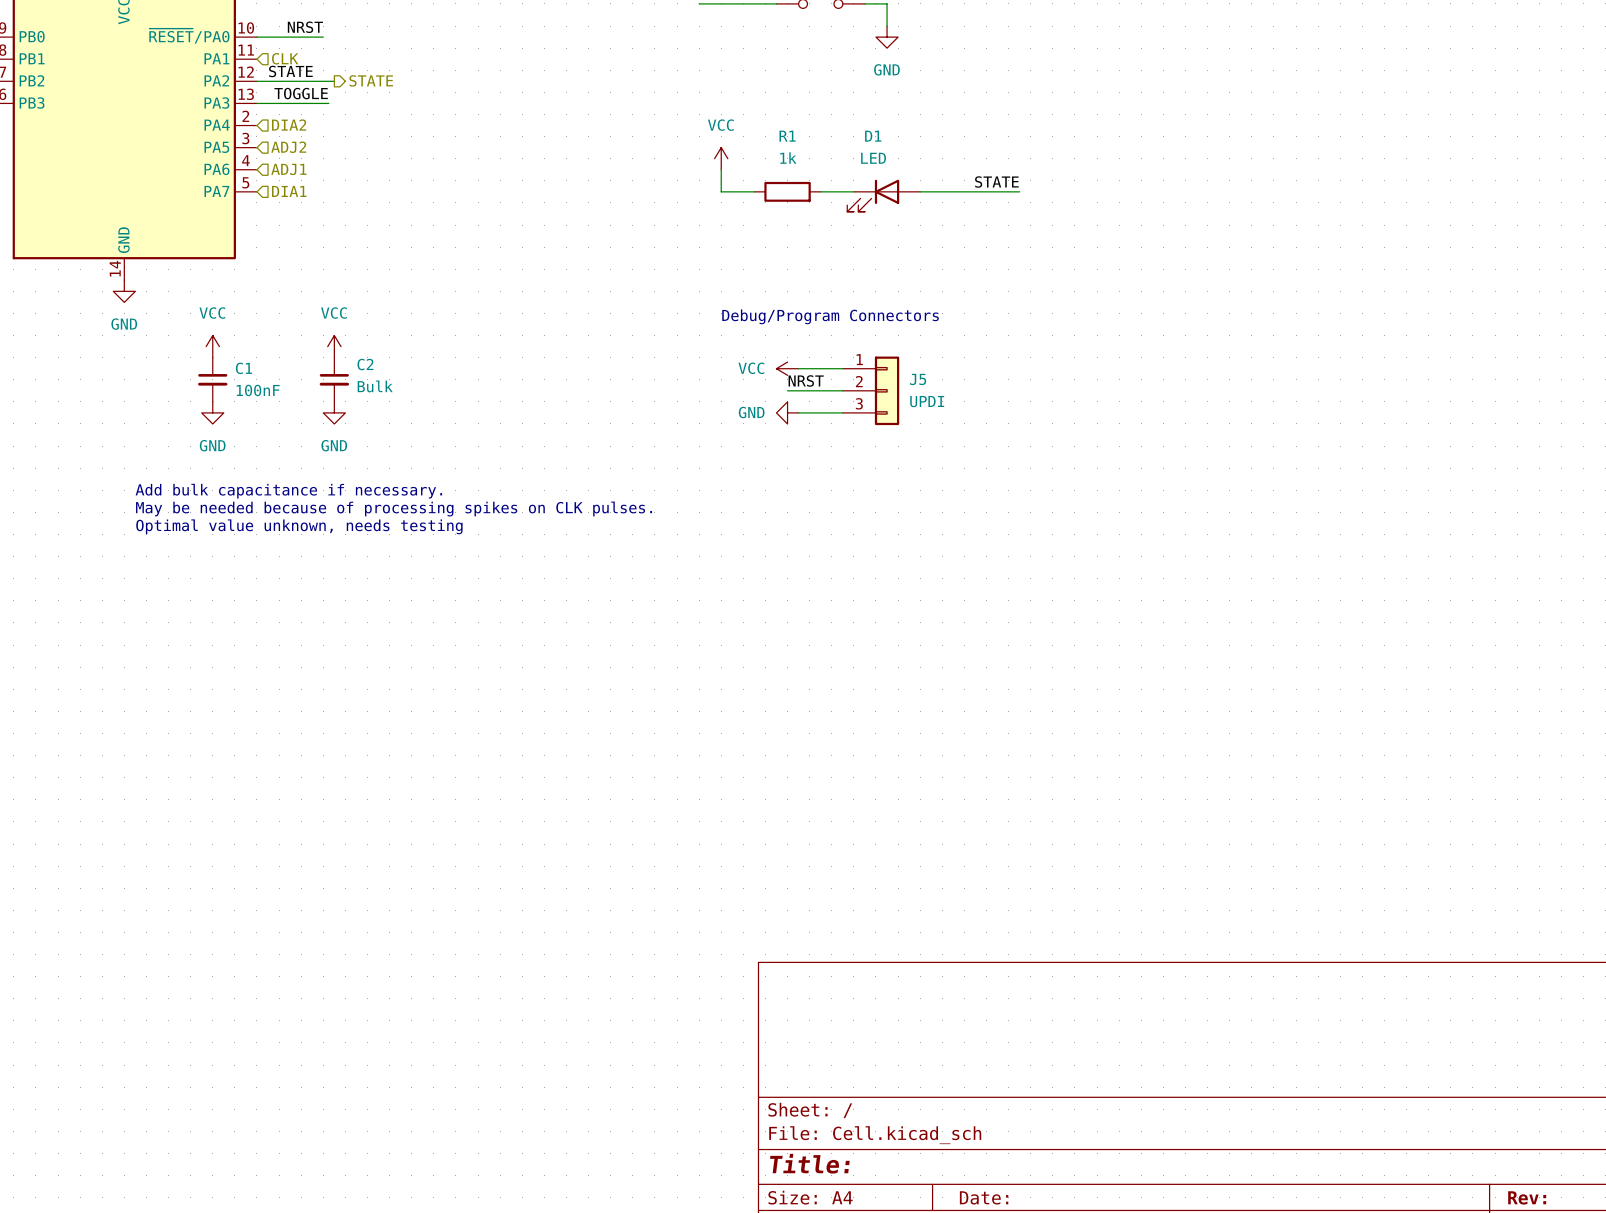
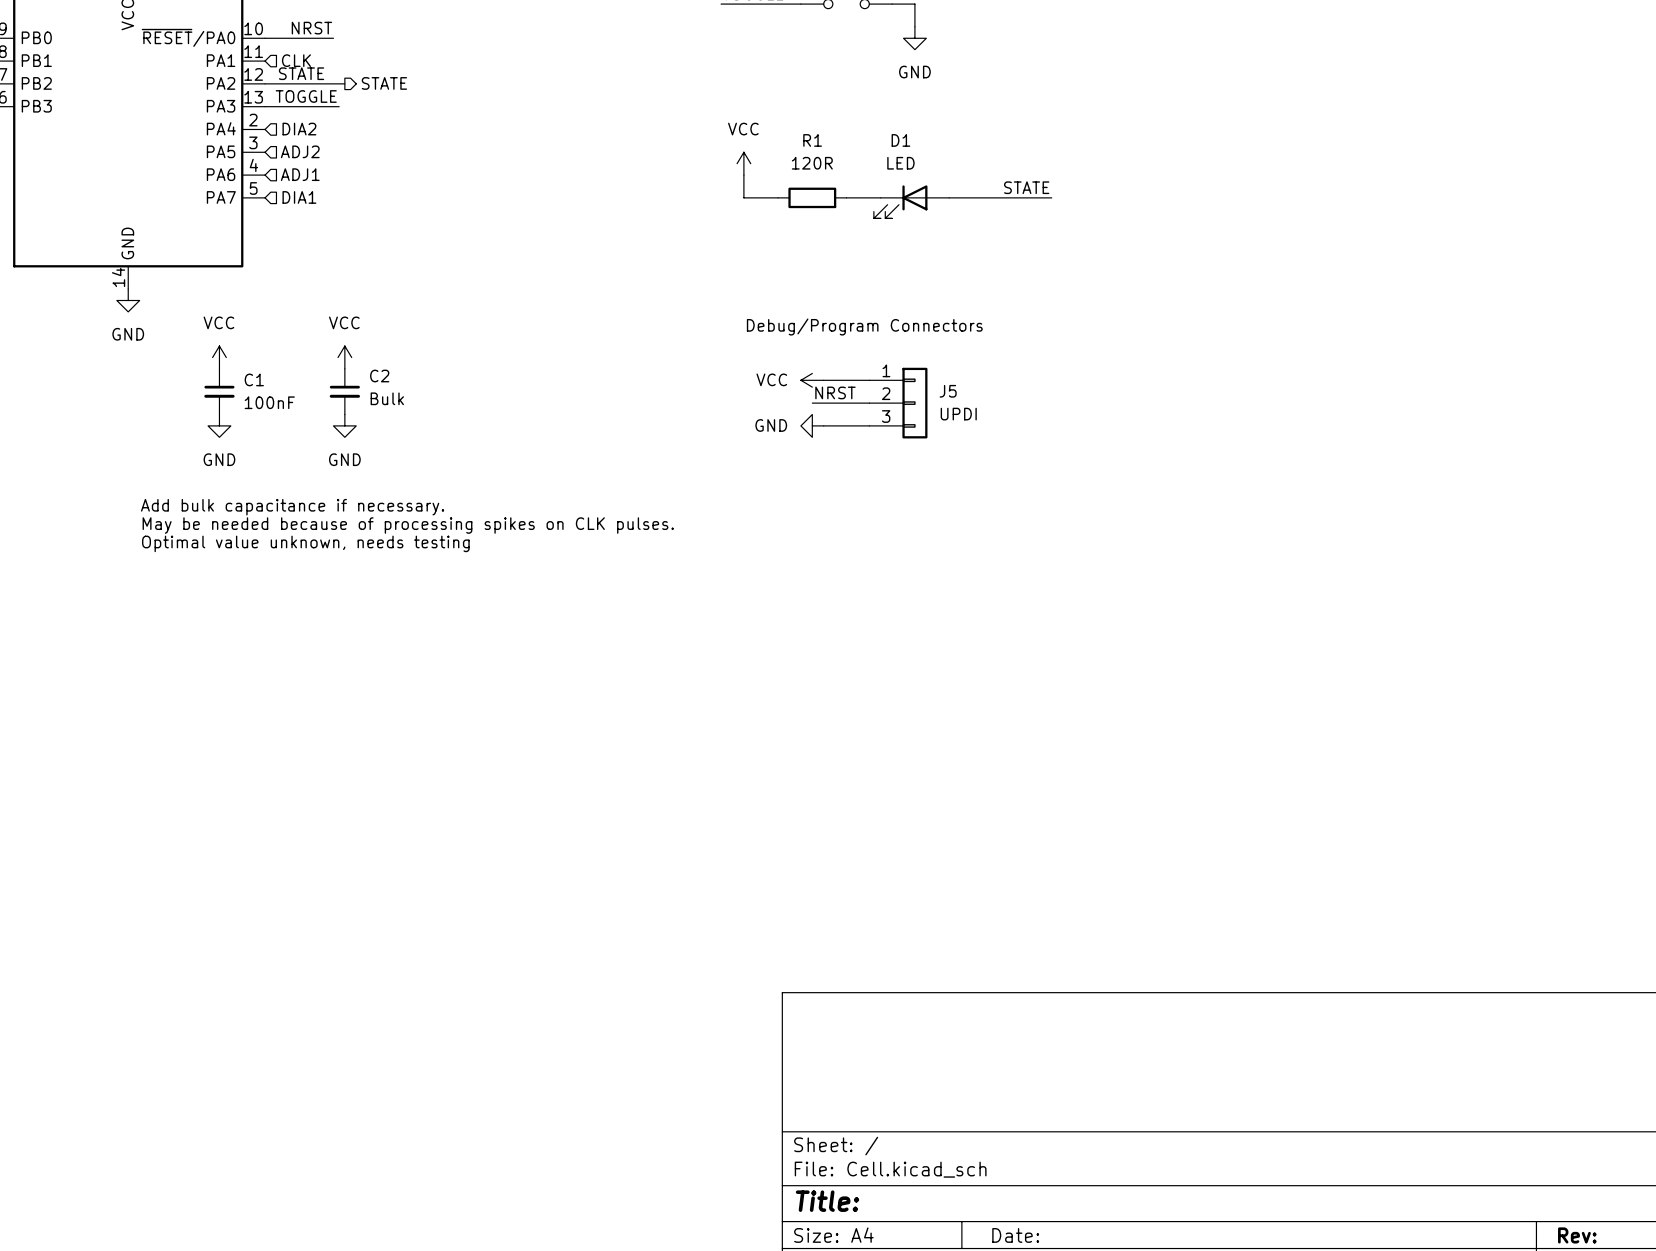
R1 value: 1k (788, 158) -> 120R (812, 163)

